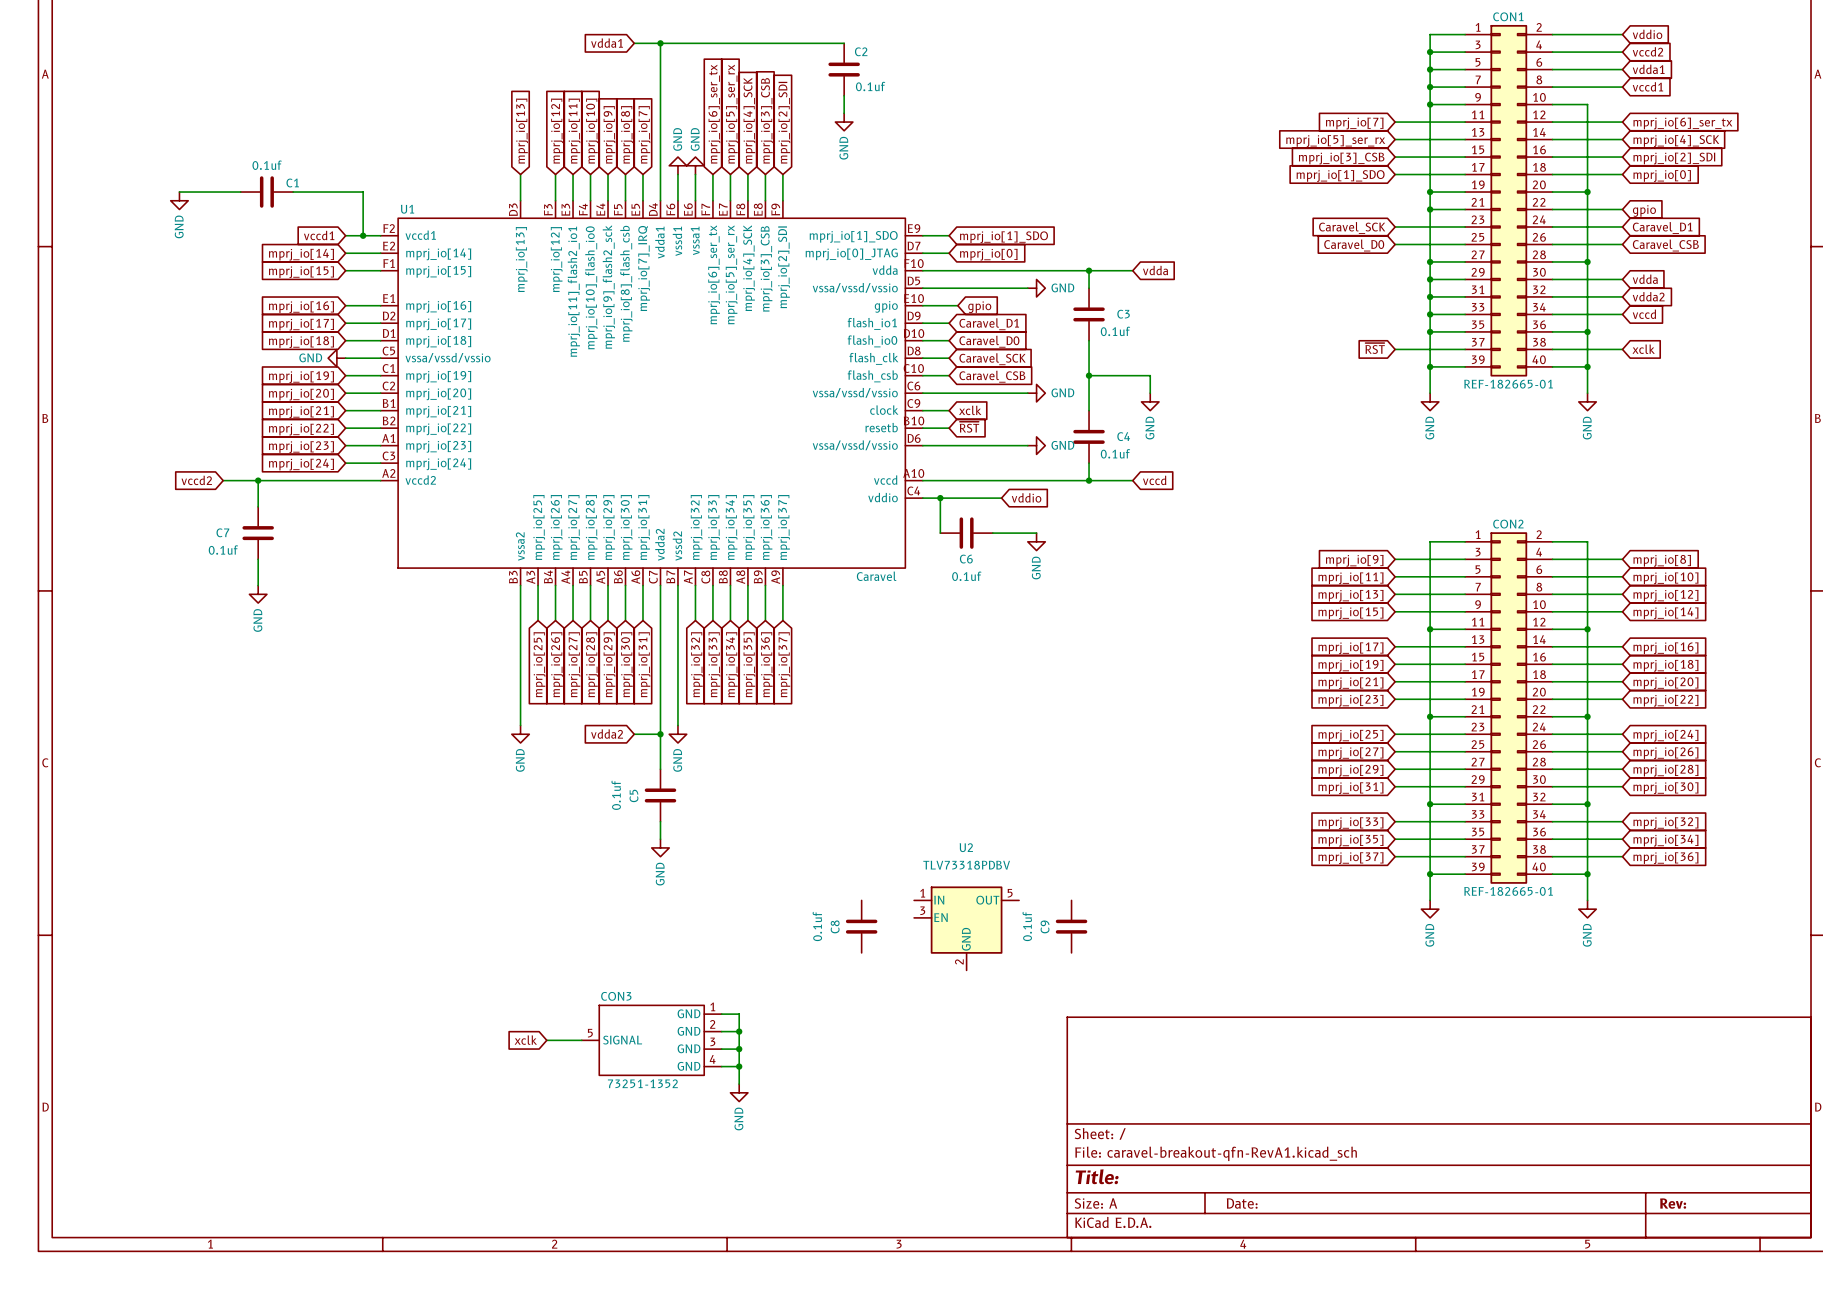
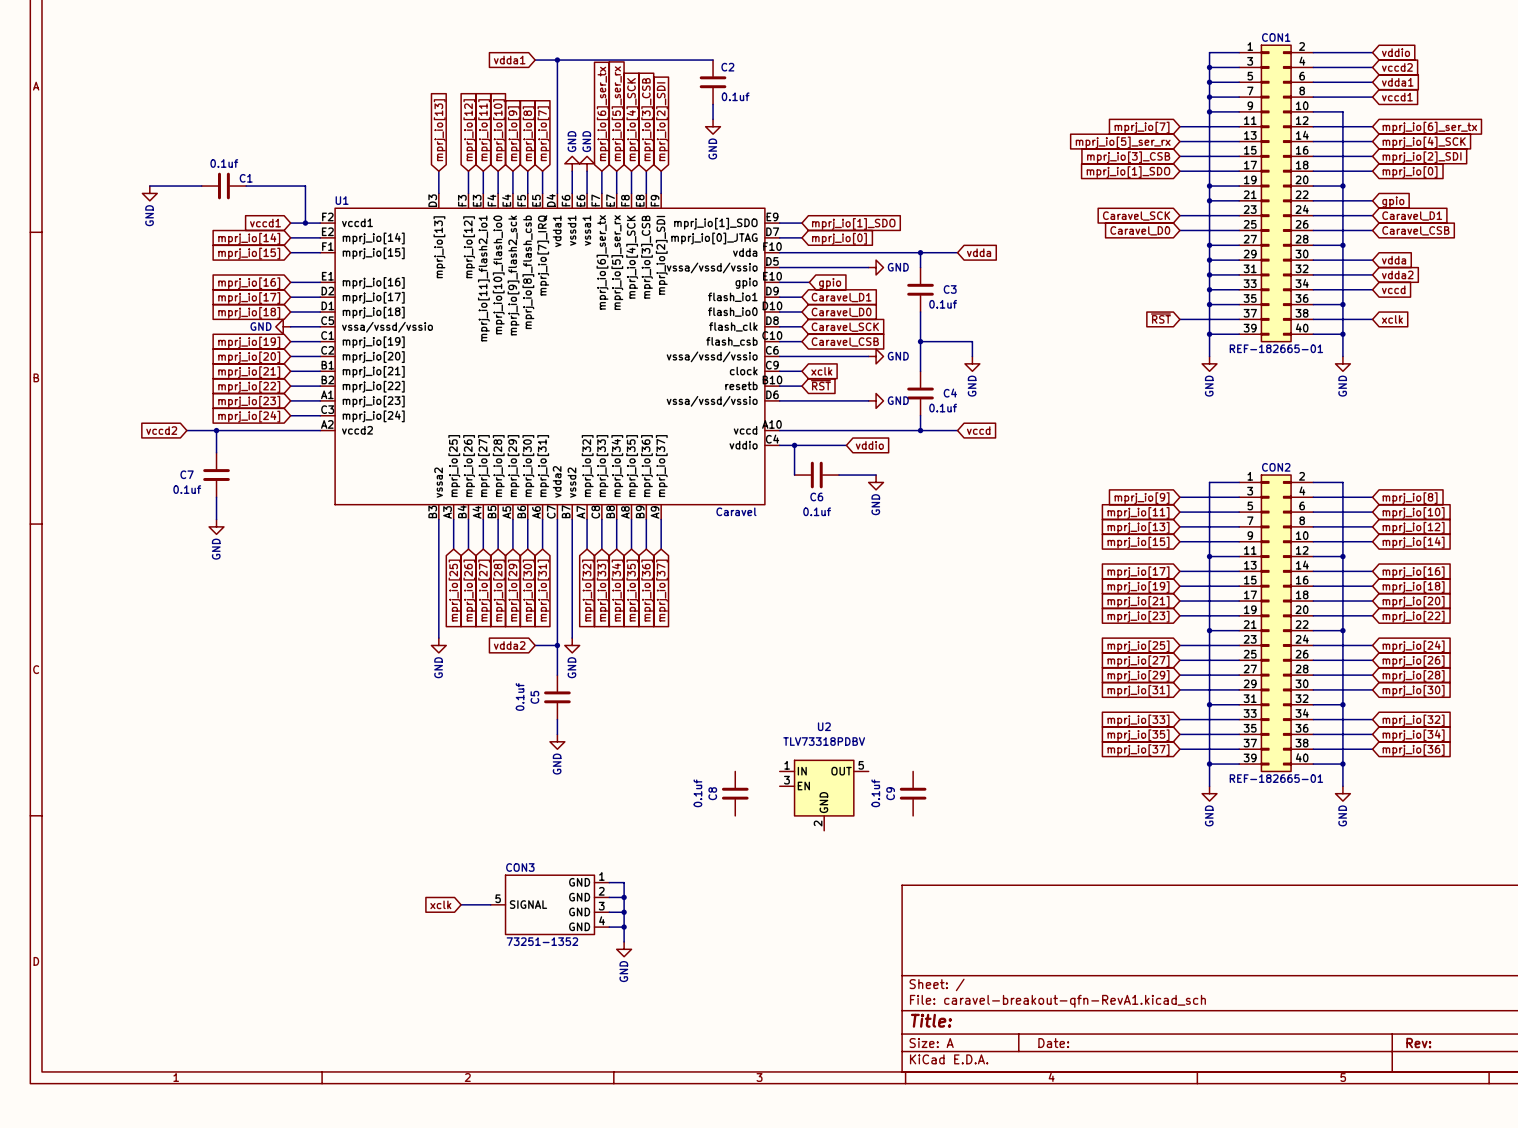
C8 position: (861, 926) -> (735, 793)
C9 position: (1071, 926) -> (913, 793)
U2 position: (966, 928) -> (824, 795)

